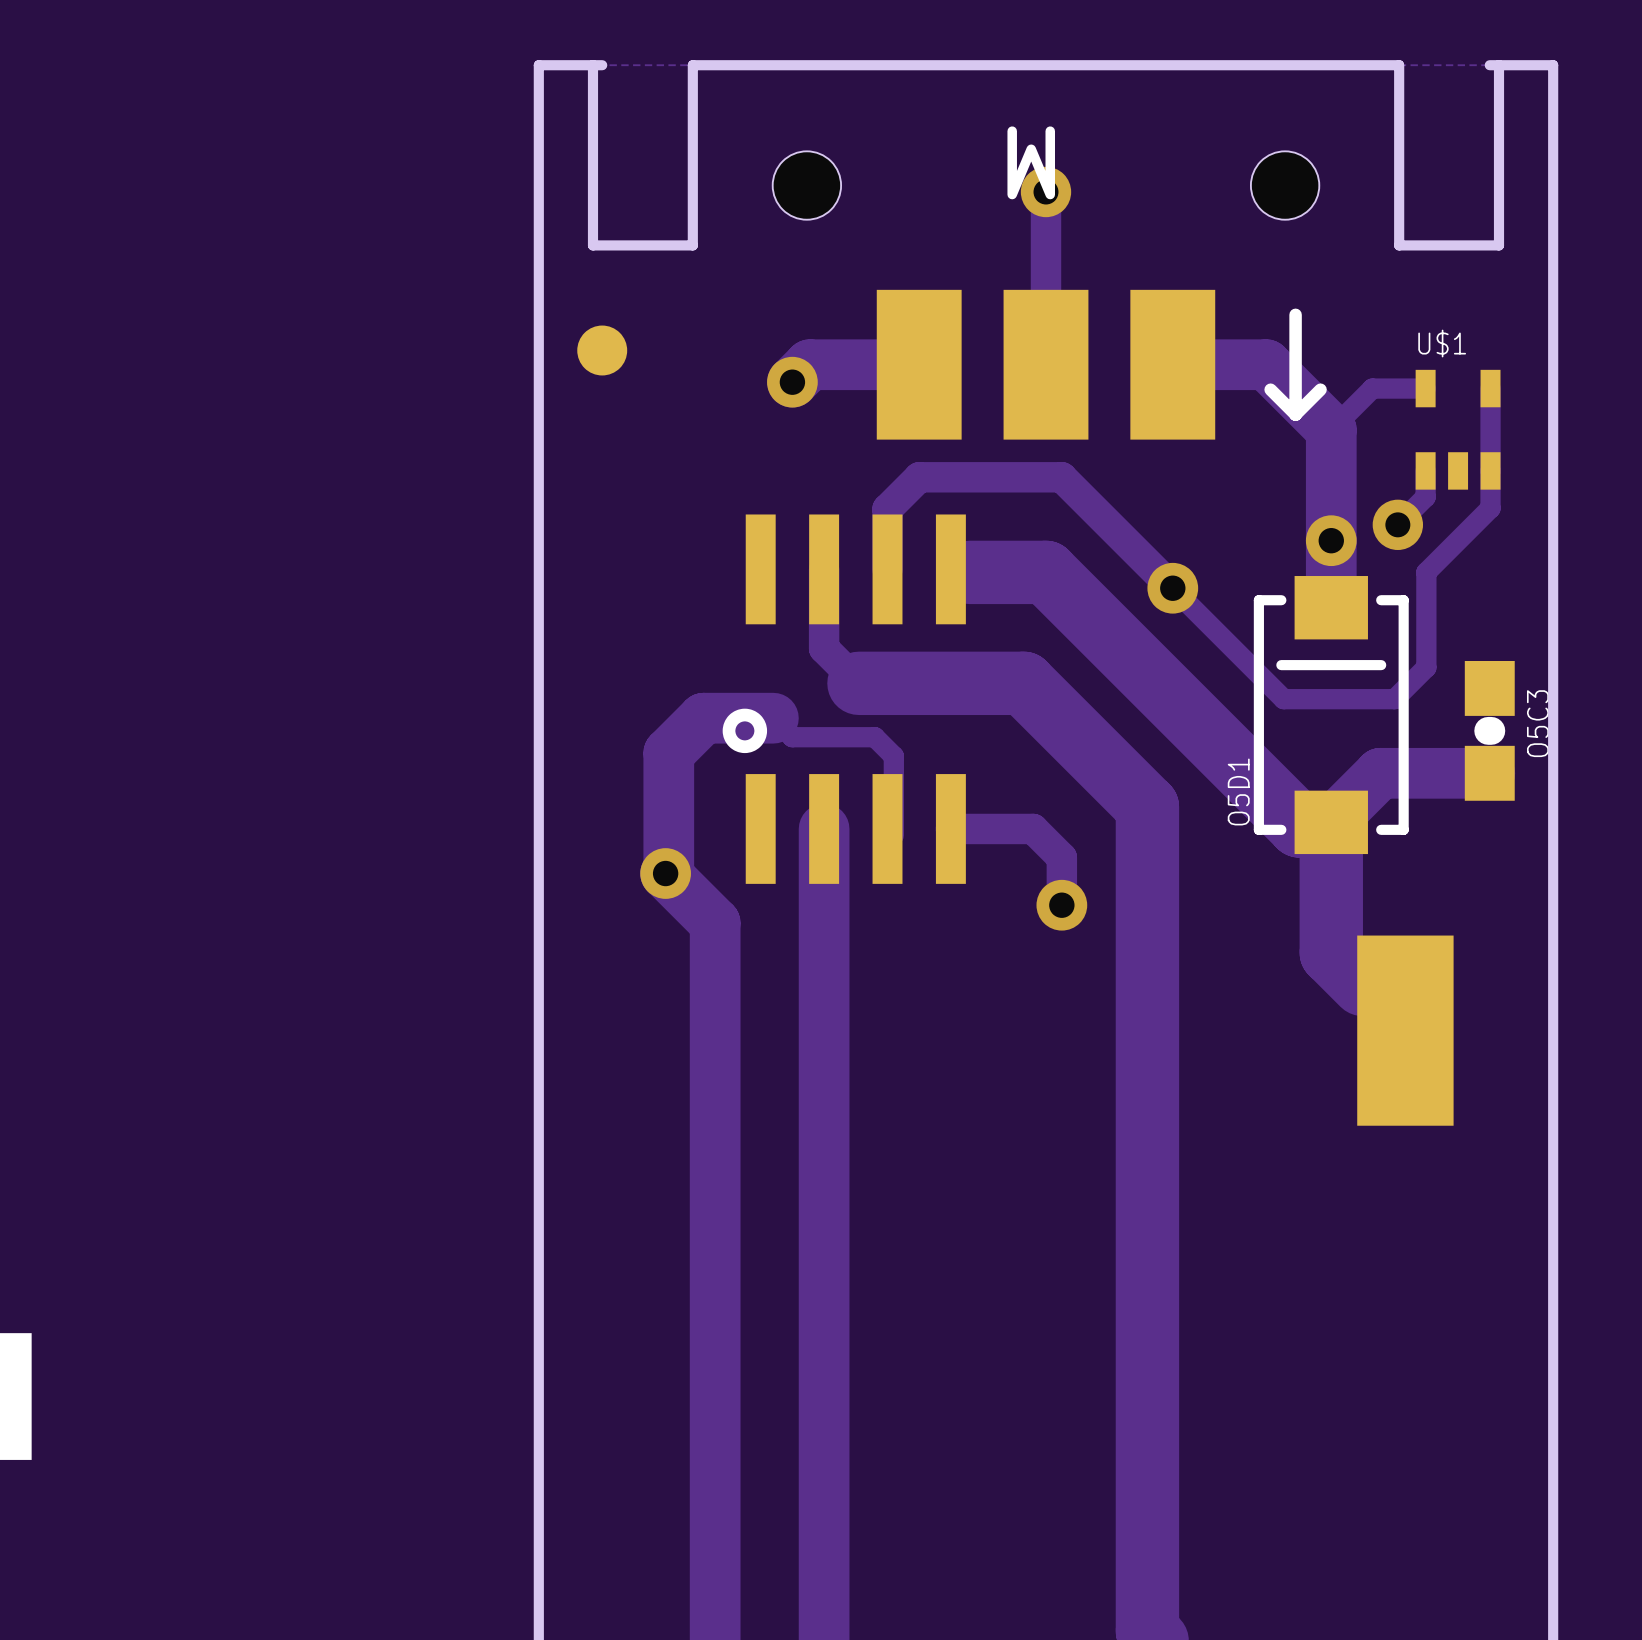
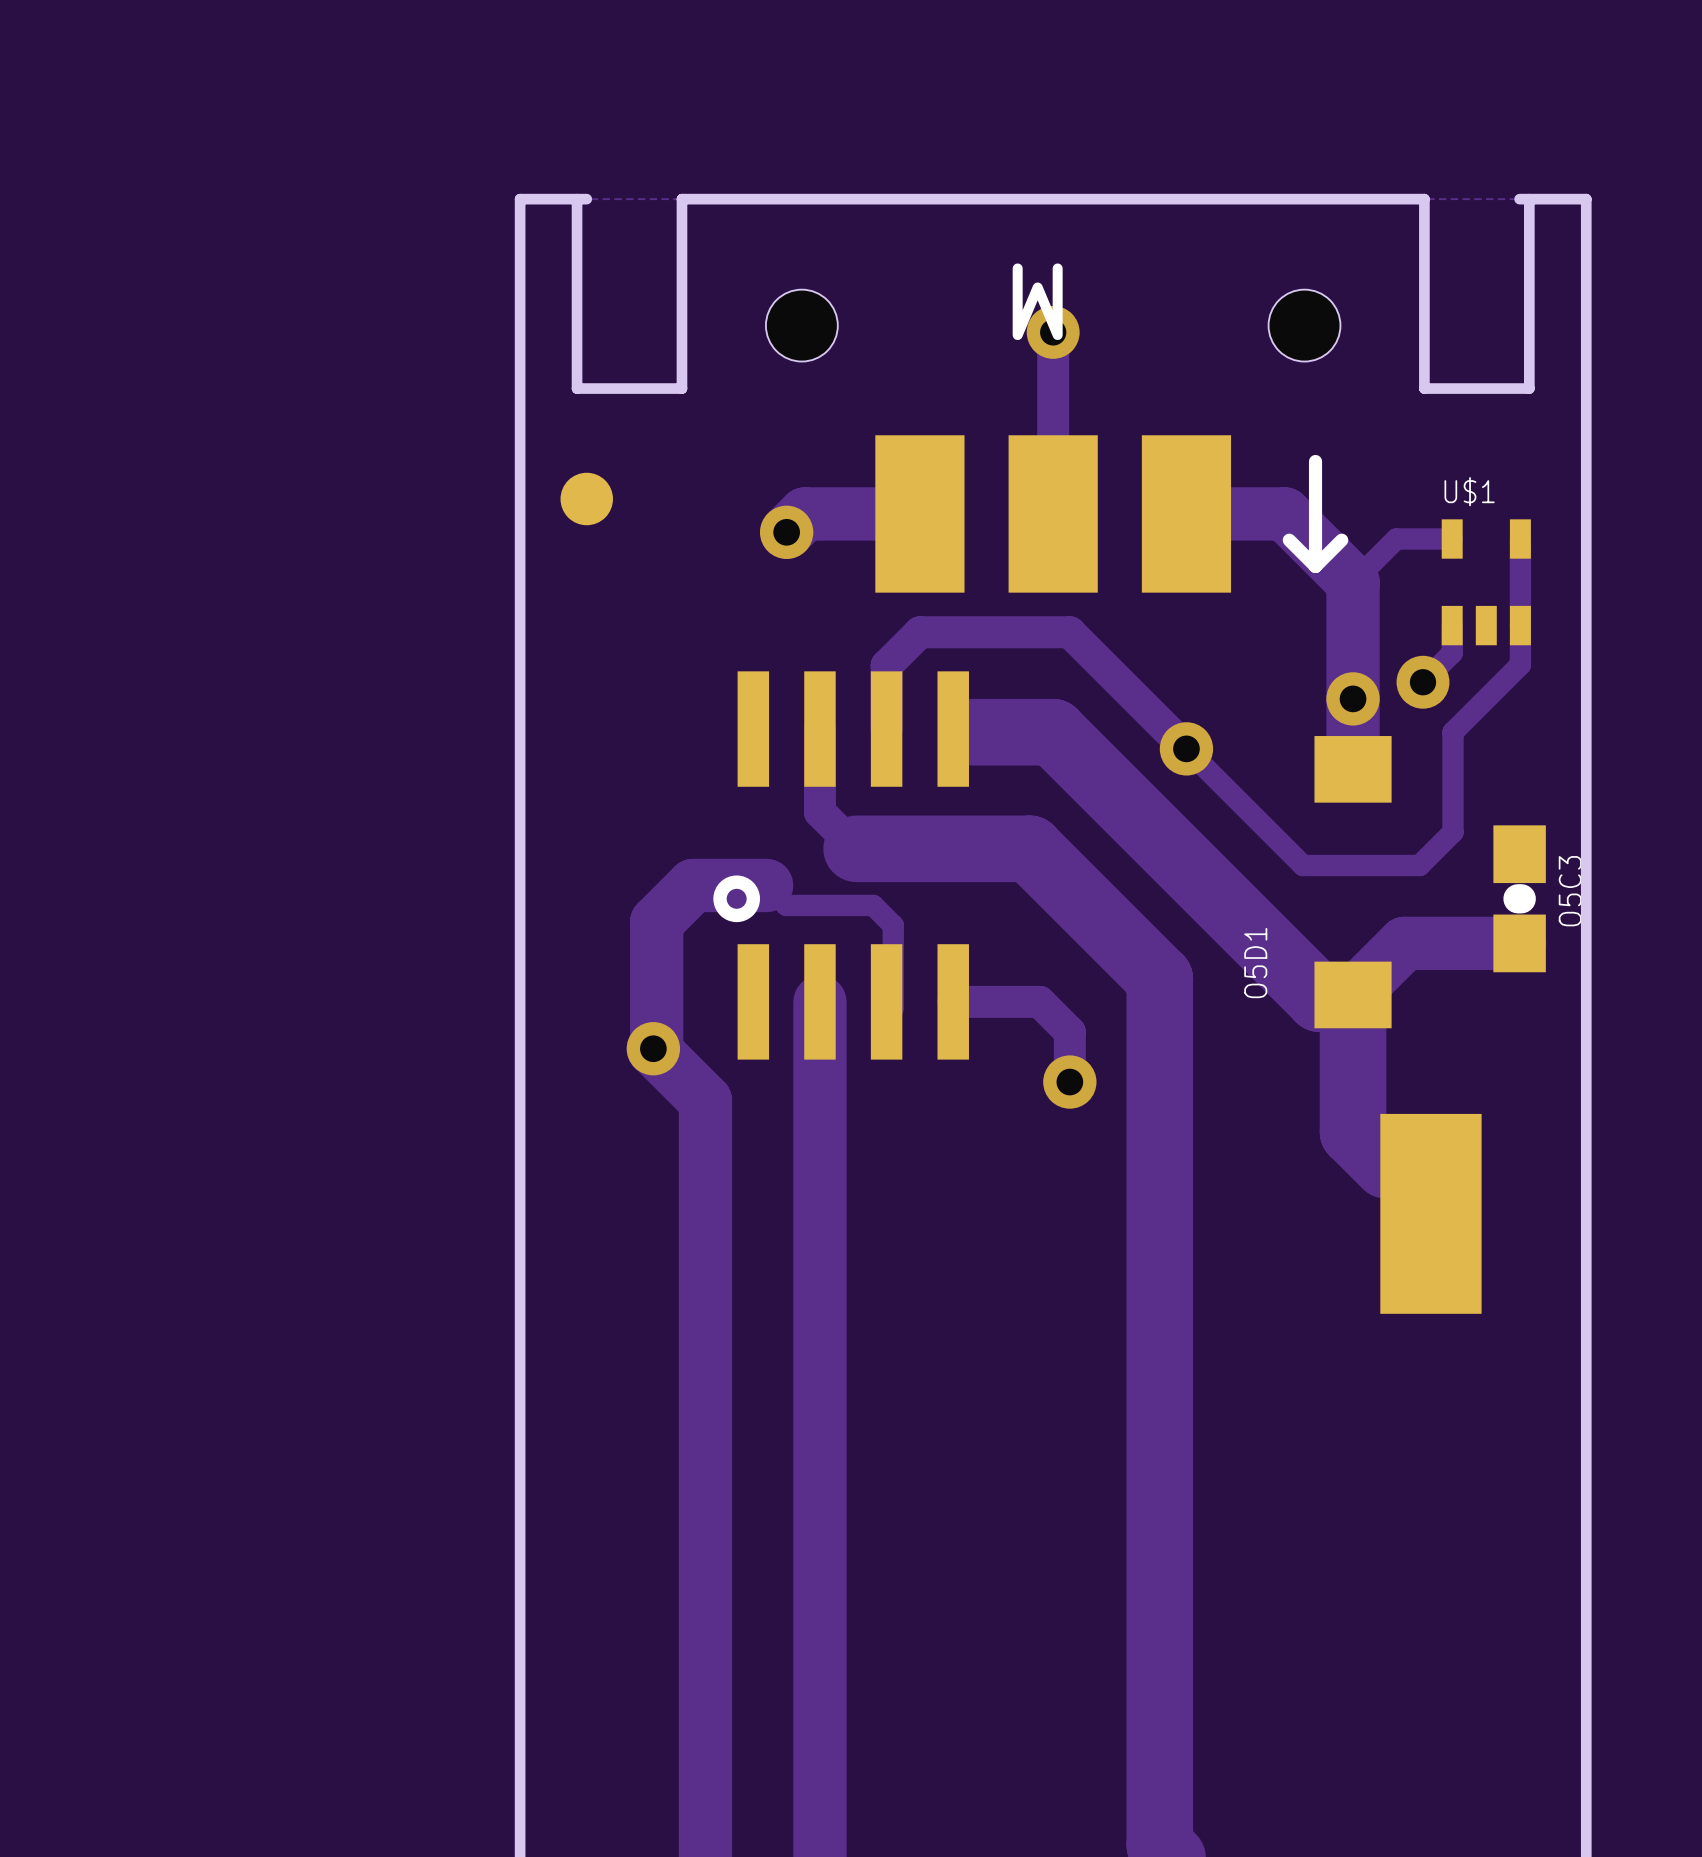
O5D1 footprint: [1253, 576, 1409, 855] -> [1314, 736, 1392, 1029]

